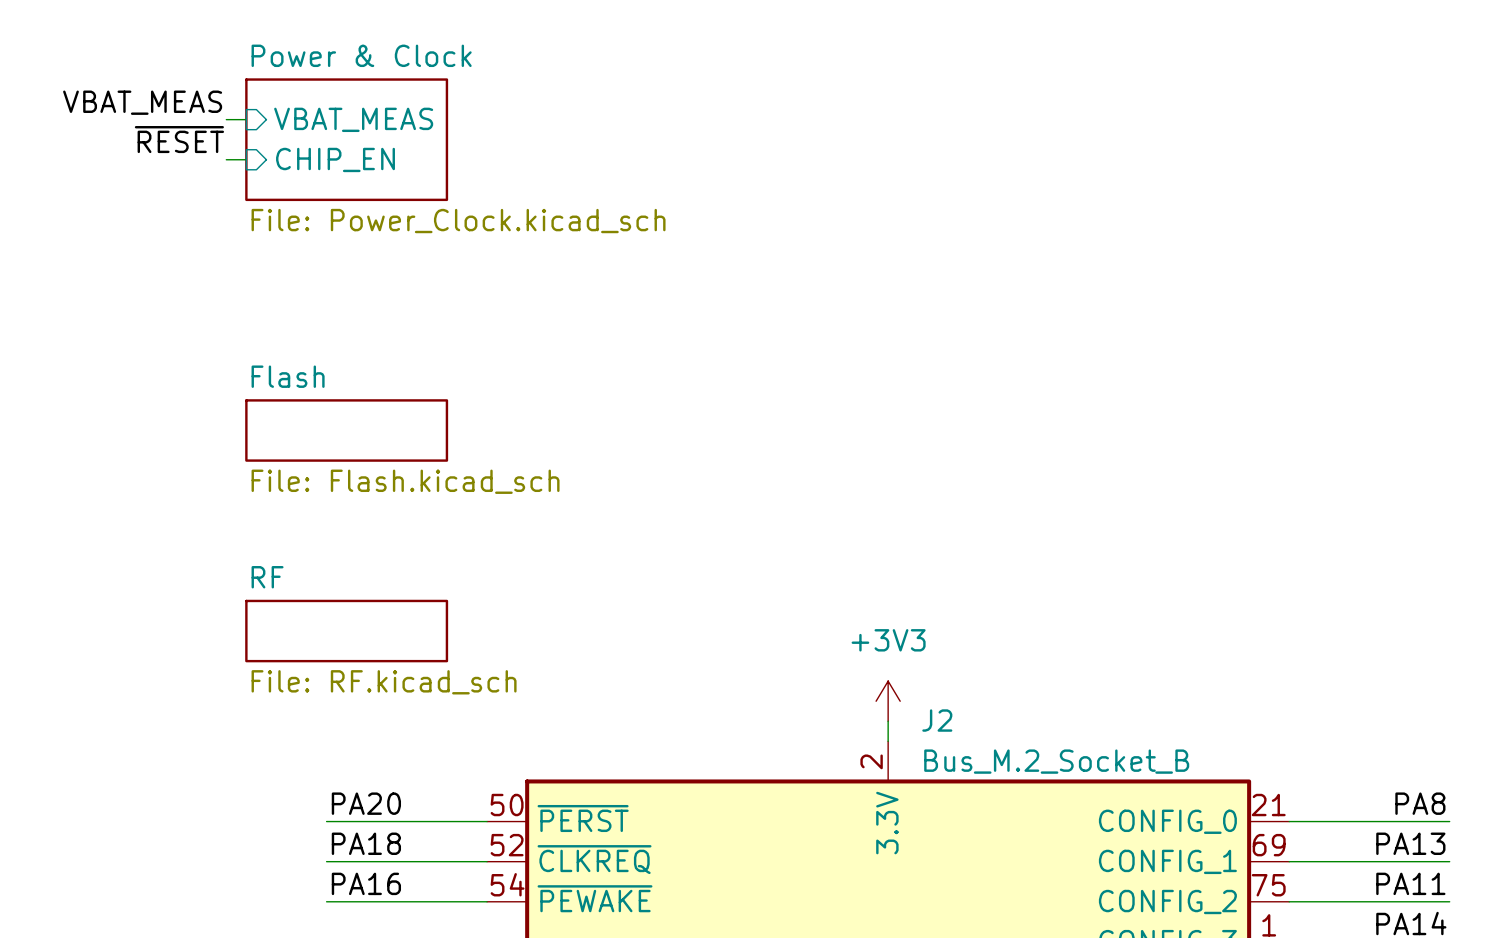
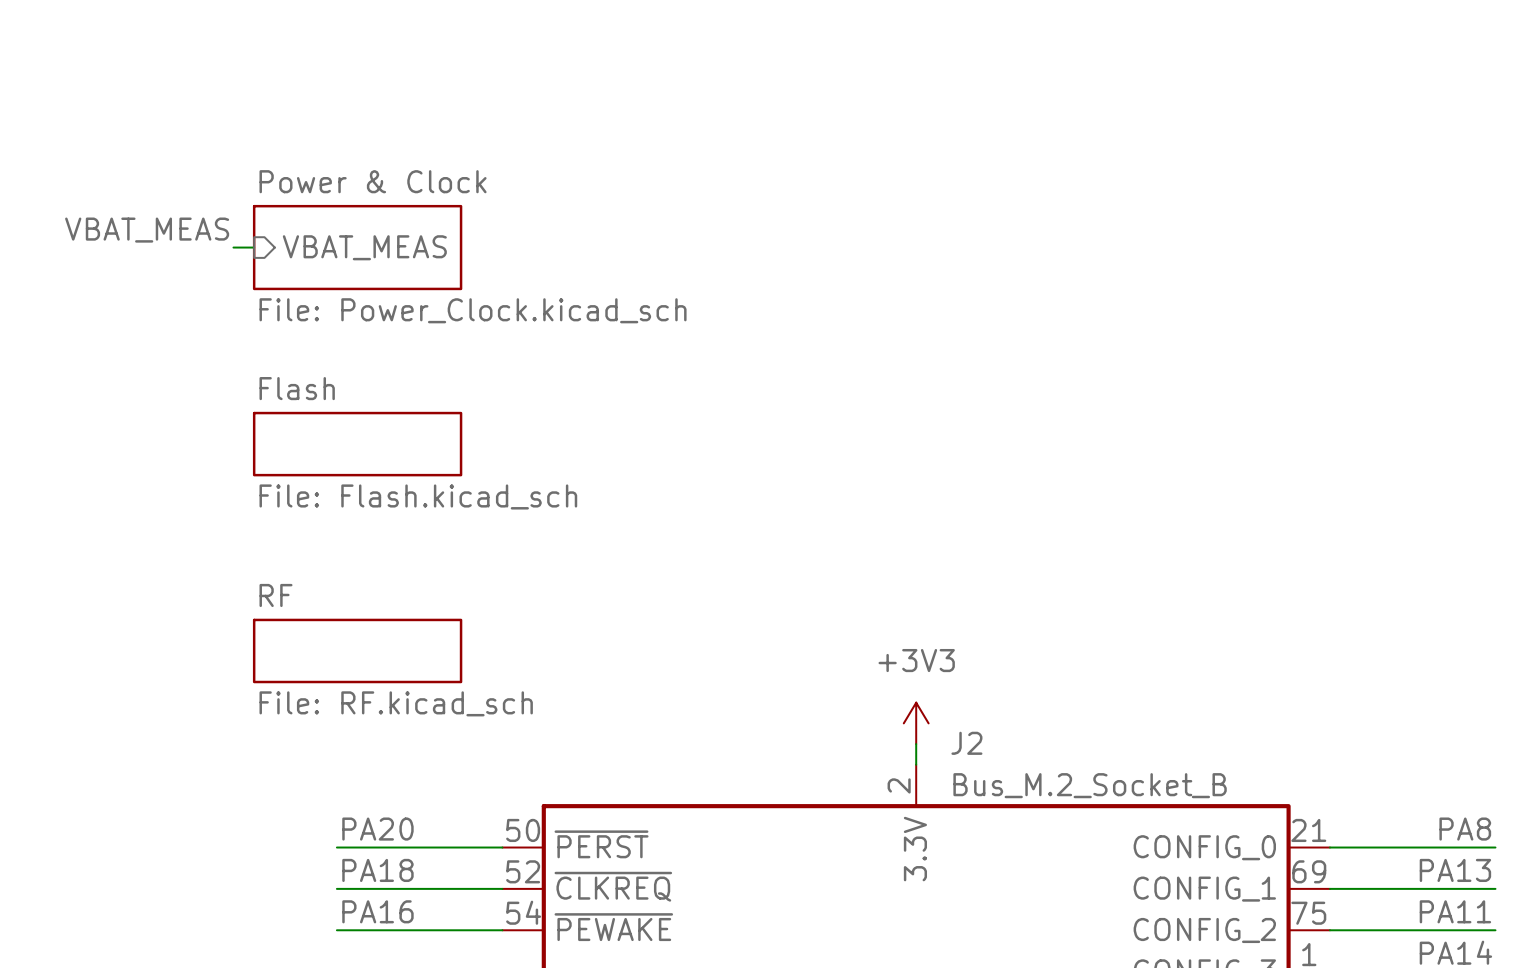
label position: VBAT_MEAS (142, 102) -> VBAT_MEAS (147, 230)
wire: (226, 119) (246, 119) -> none
sheet pin position: VBAT_MEAS (353, 119) -> VBAT_MEAS (364, 247)
label: ~{RESET} (179, 139) -> none
sheet Power & Clock: File: Power_Clock.kicad_sch (346, 139) -> none
wire: (226, 159) (246, 159) -> (233, 247) (254, 247)
sheet pin: CHIP_EN (335, 159) -> none
sheet Power & Clock: none -> File: Power_Clock.kicad_sch (357, 247)

